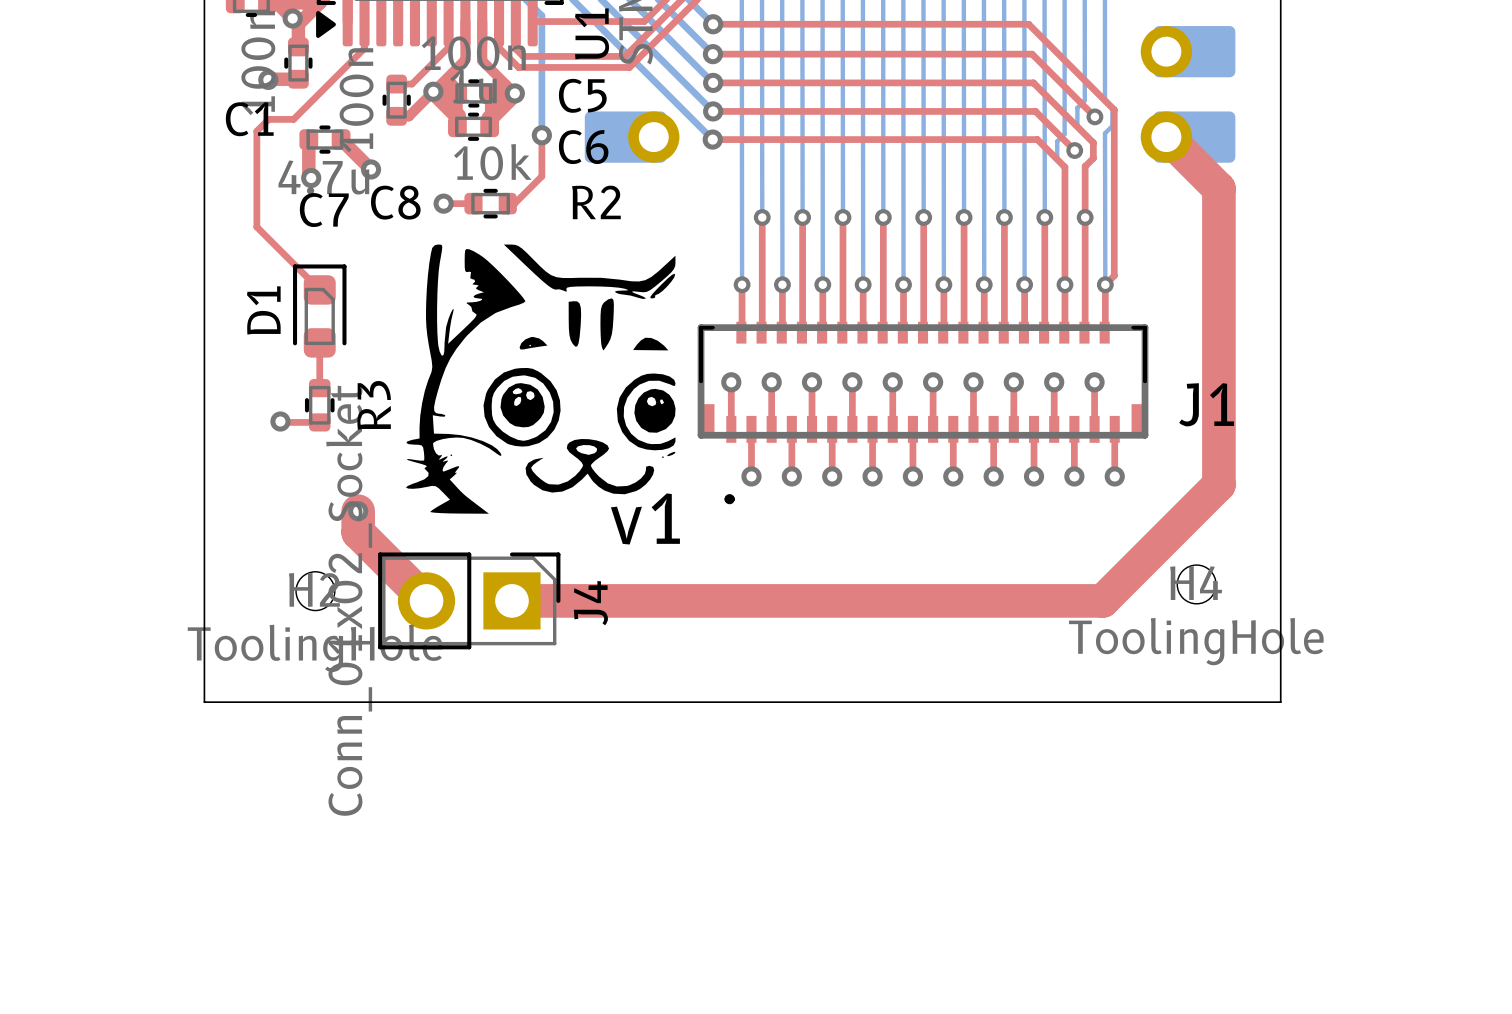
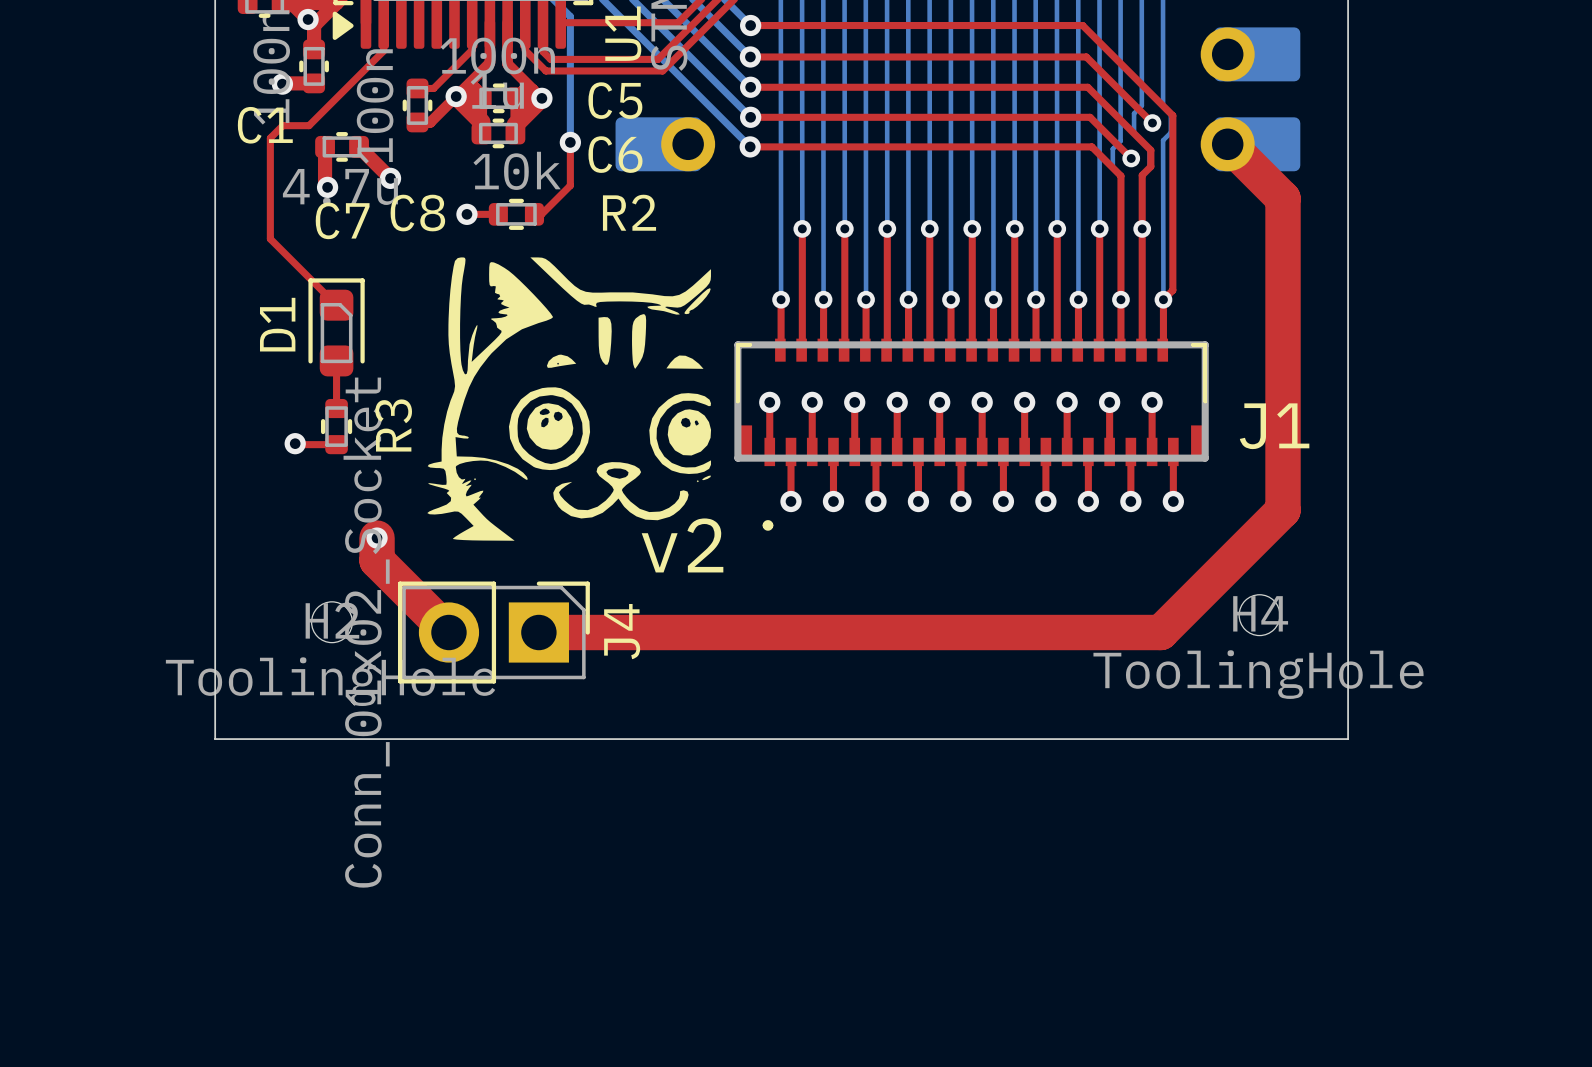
v1 name: v1 (645, 518) -> v2 (682, 545)

